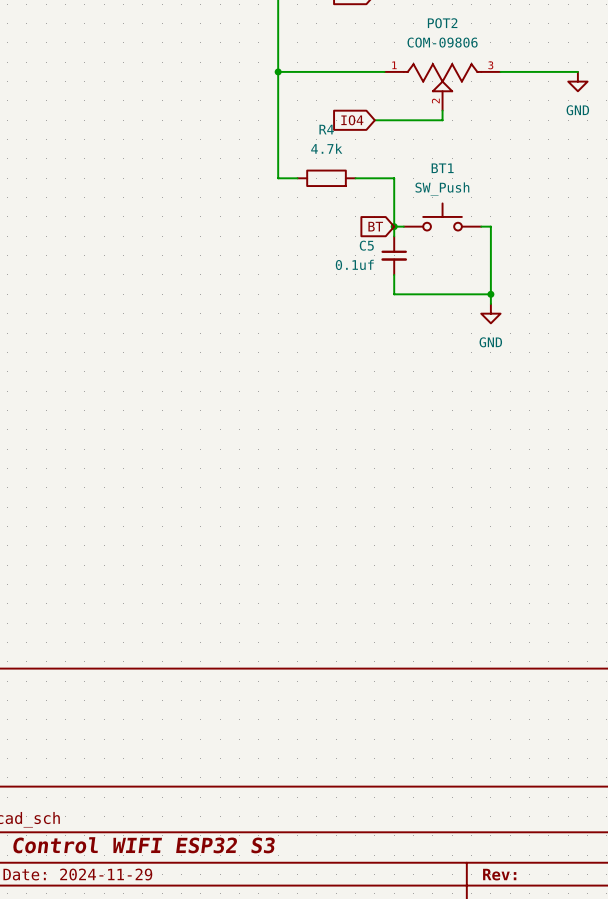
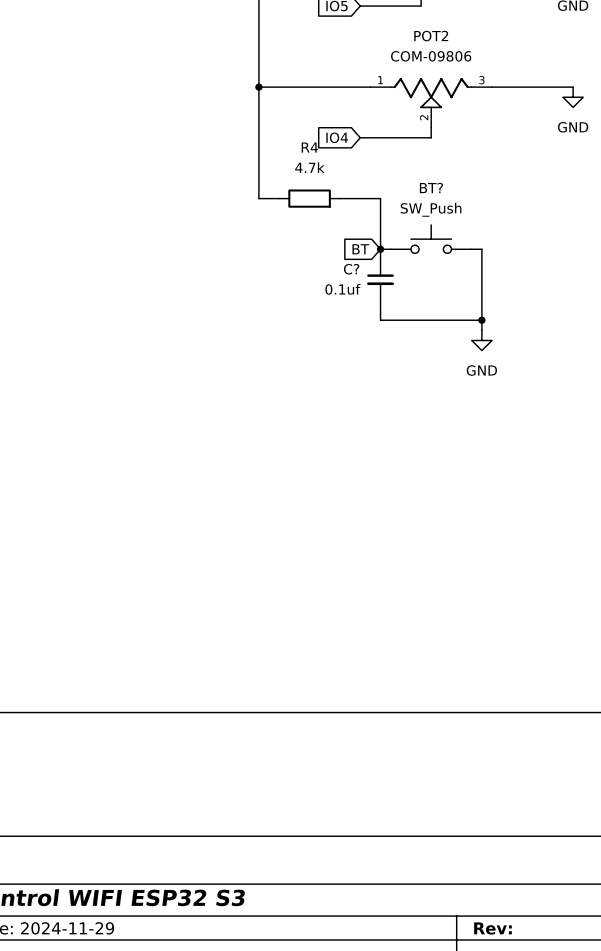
BT1 name: BT1 (442, 168) -> BT? (431, 187)
C5 name: C5 (366, 245) -> C? (351, 269)

